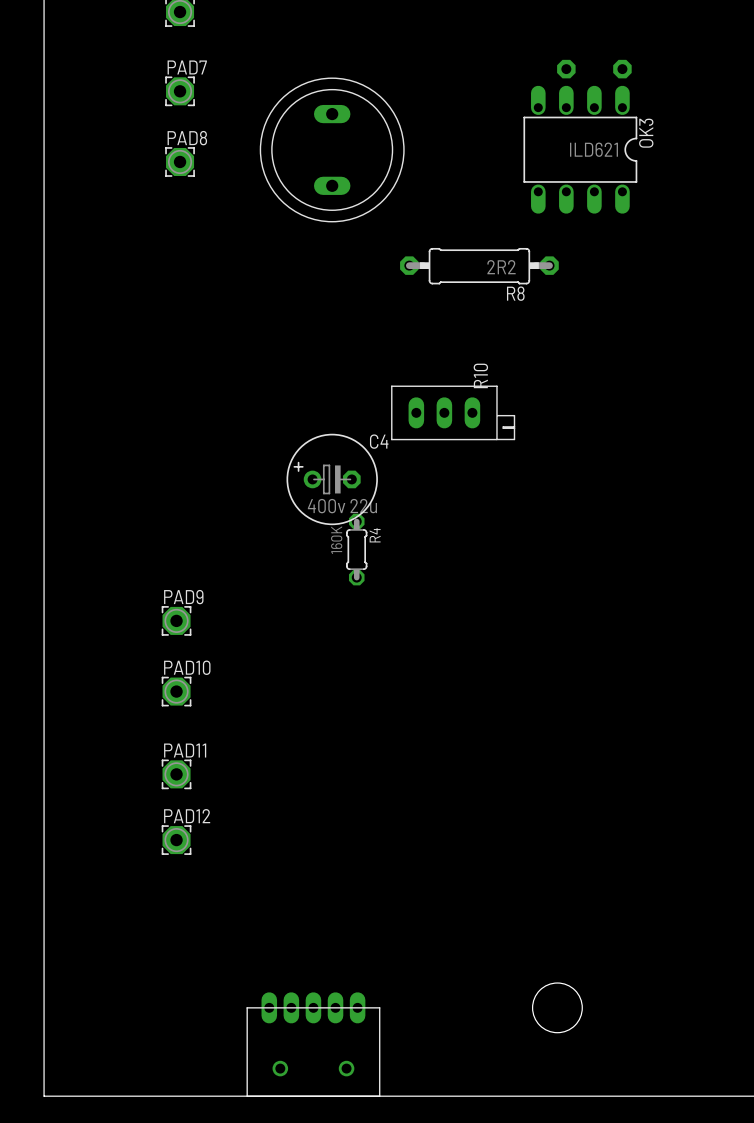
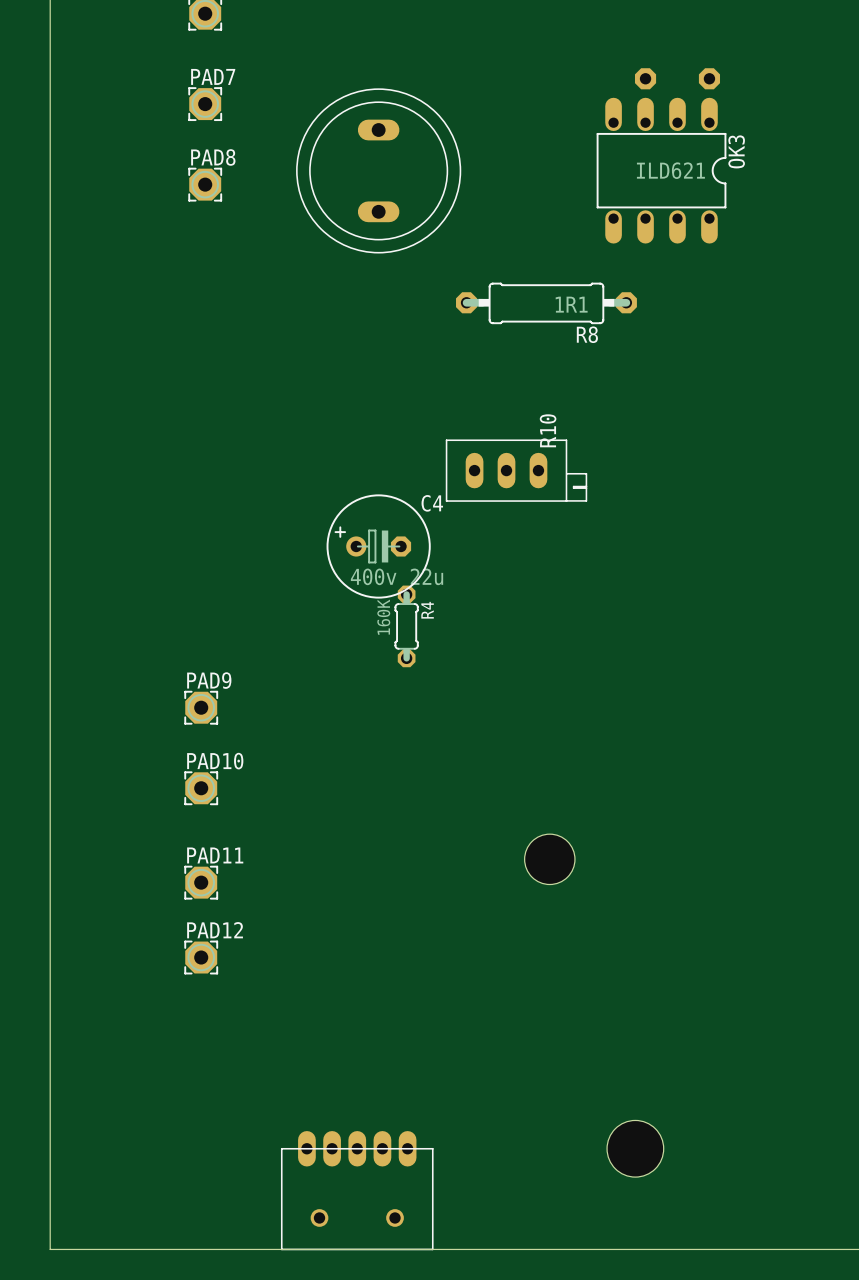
R8 value: 2R2 (501, 267) -> 1R1 (571, 304)
hole: none -> (549, 859)

